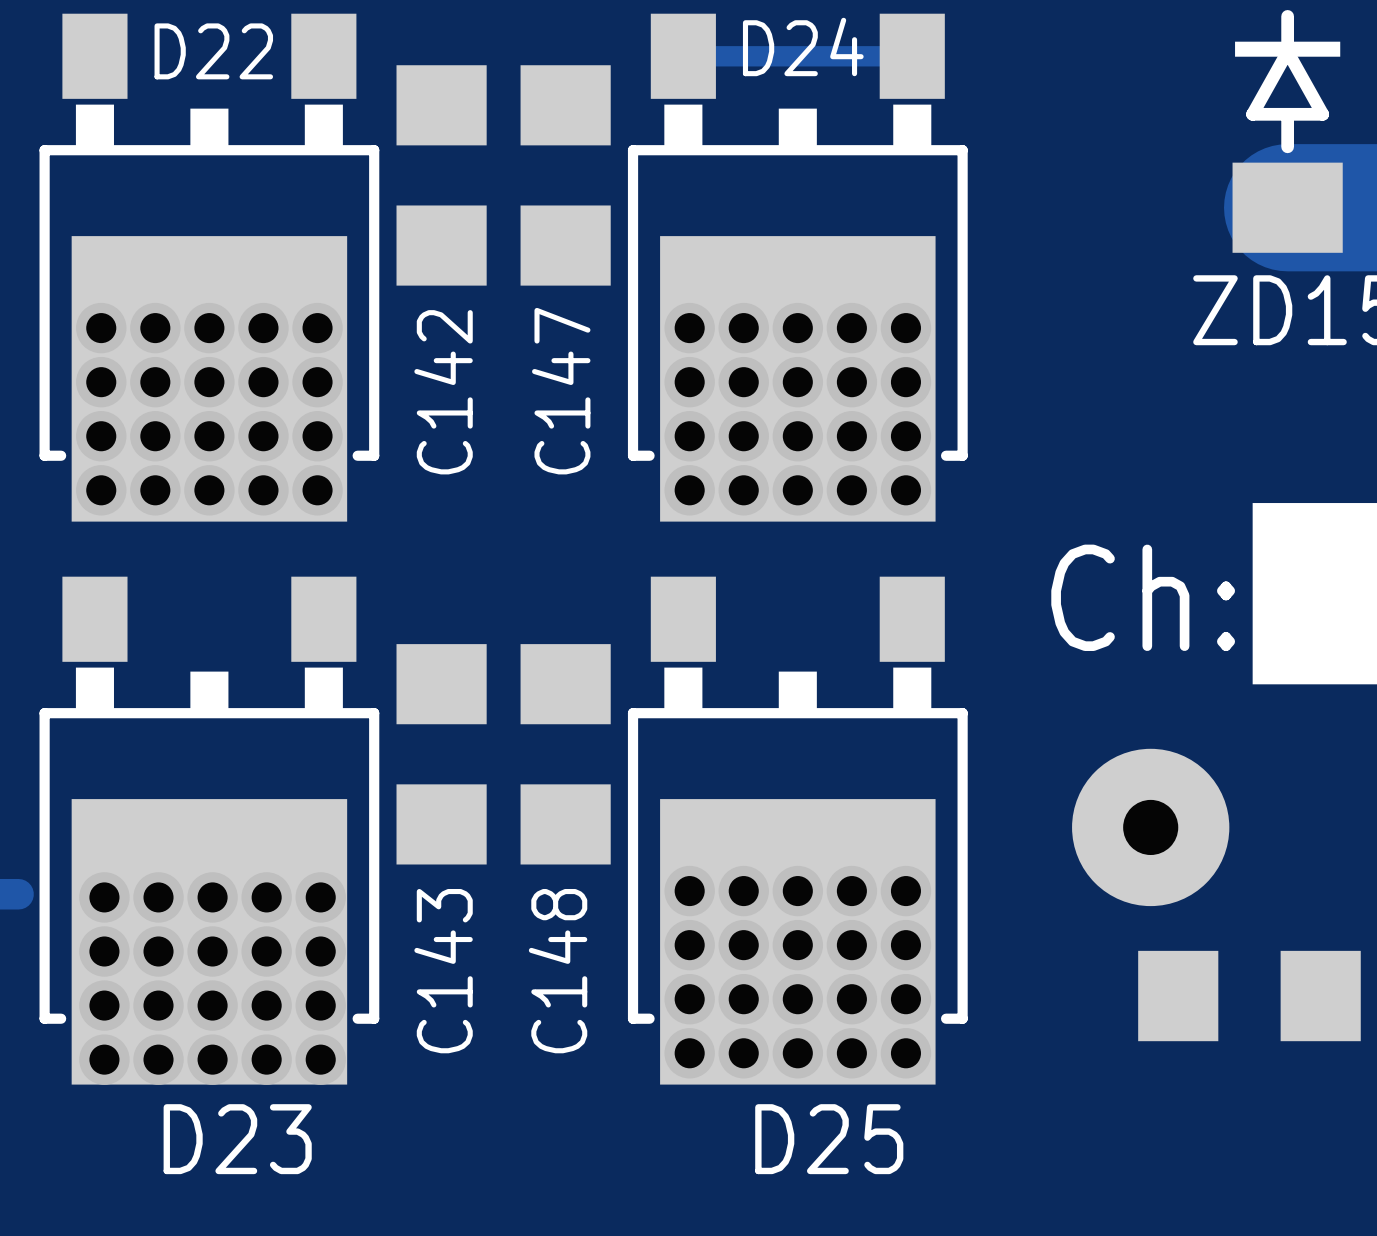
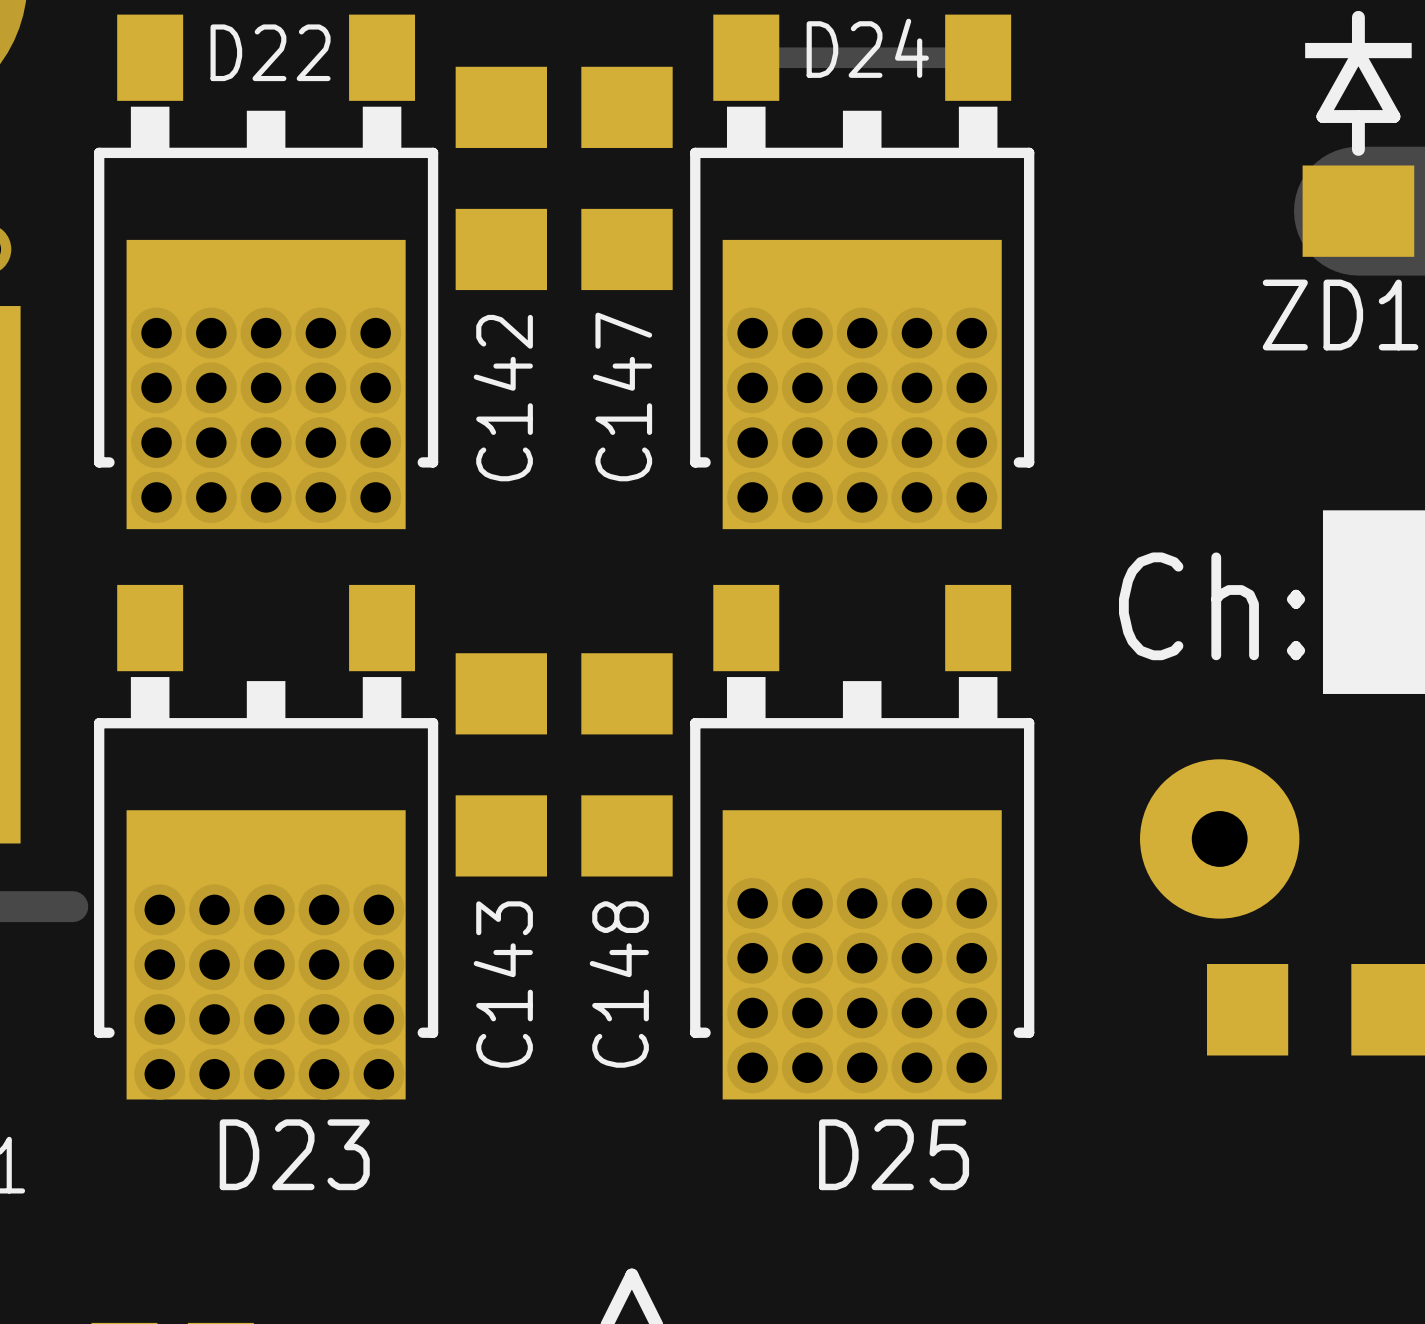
D22 footprint: [39, 13, 380, 522] -> [94, 14, 439, 530]
D24 footprint: [627, 13, 968, 522] -> [690, 14, 1035, 530]
D23 footprint: [39, 576, 380, 1085] -> [94, 584, 439, 1100]
D25 footprint: [627, 576, 968, 1085] -> [690, 584, 1035, 1100]

